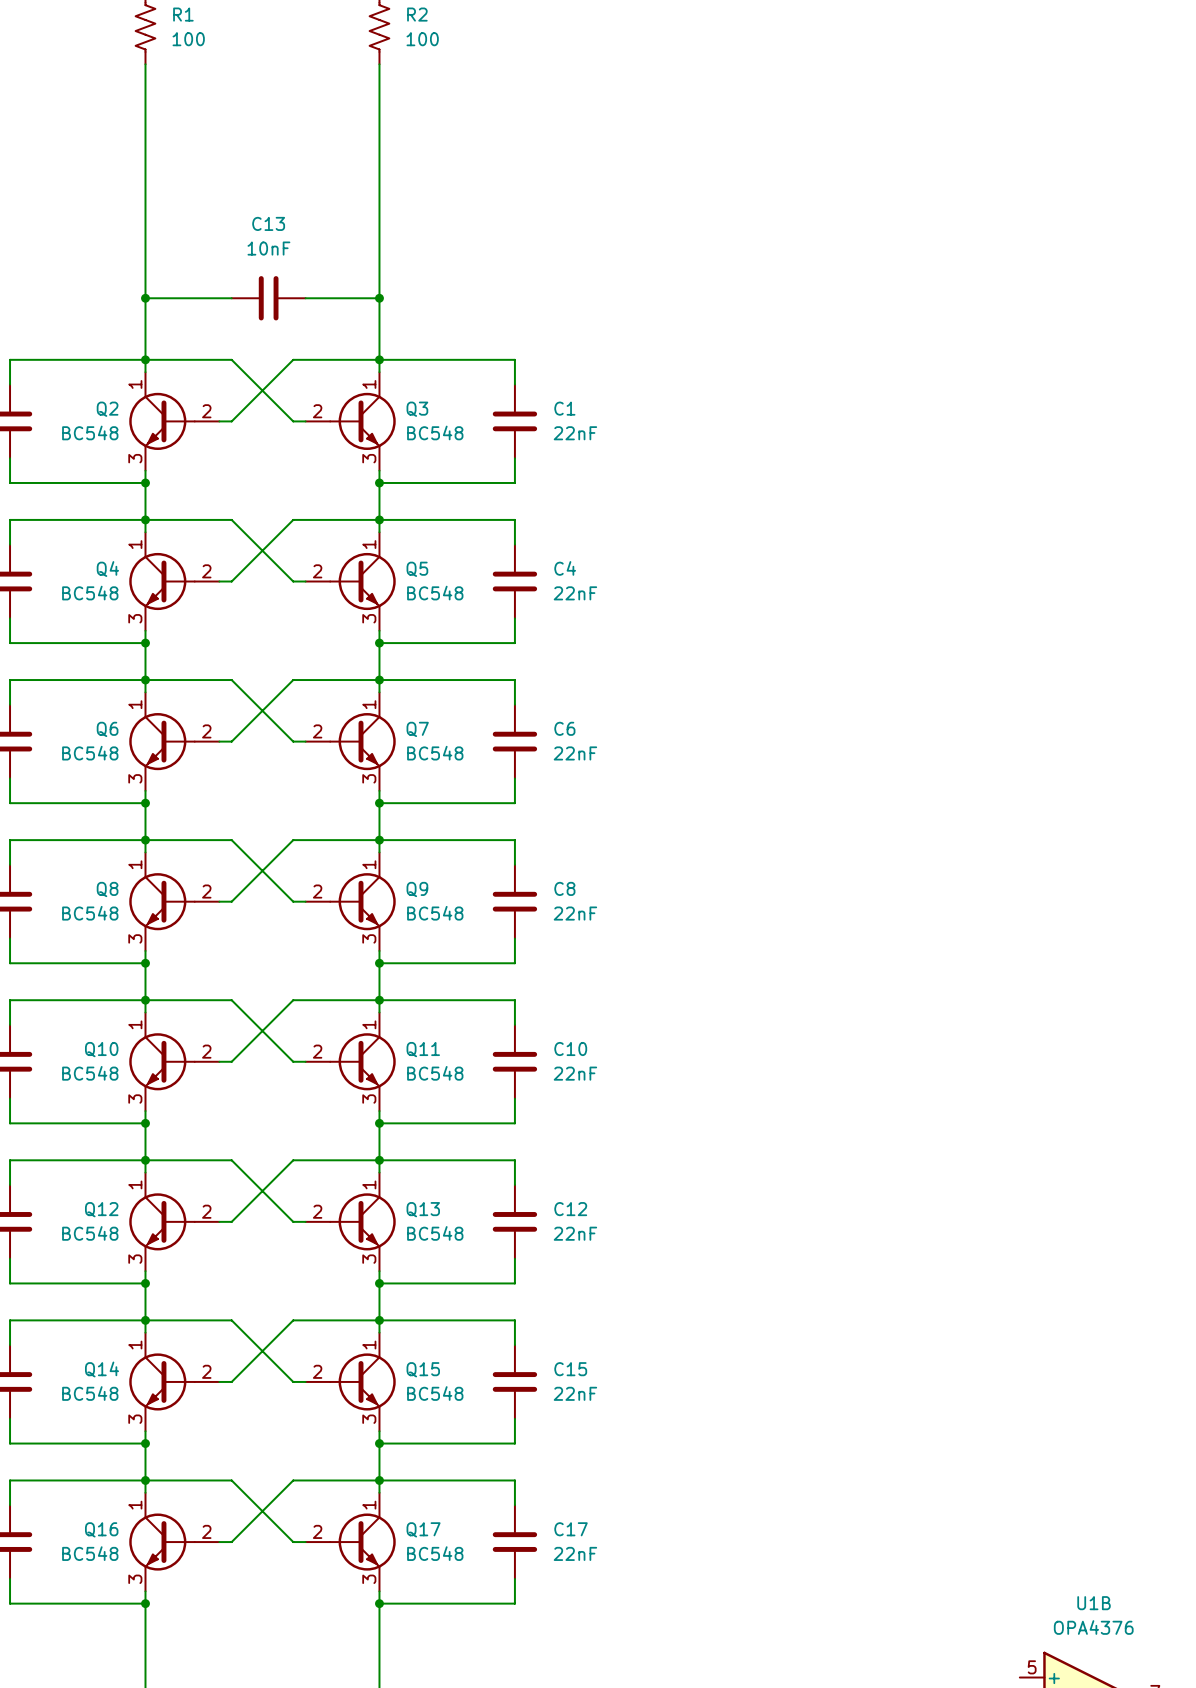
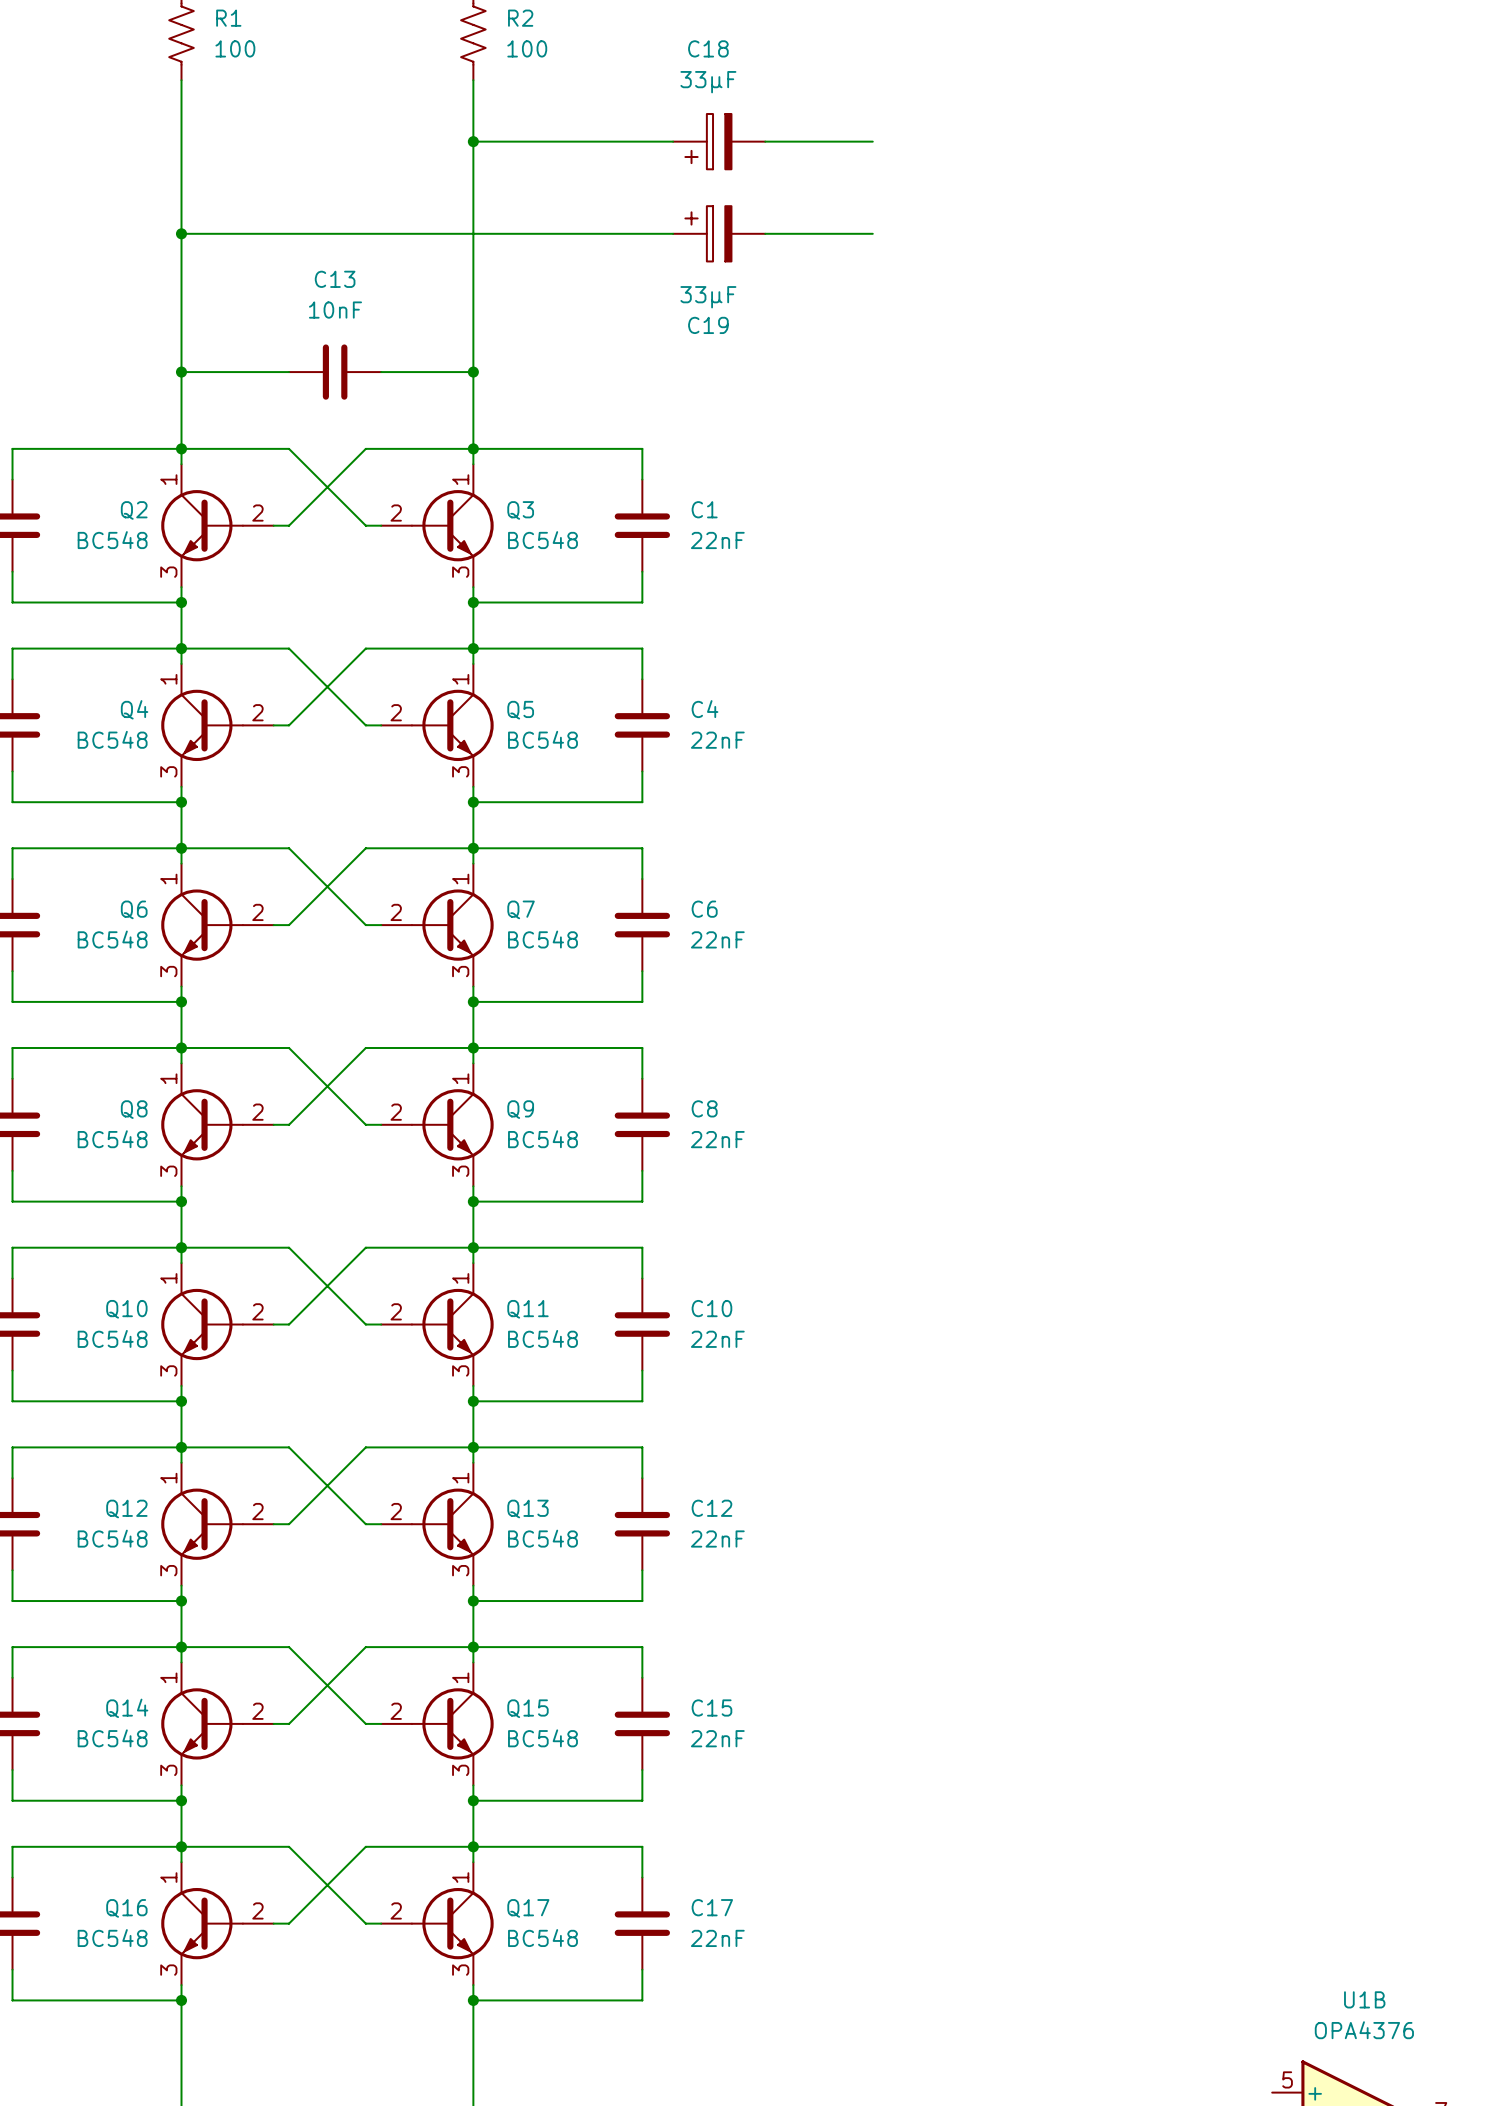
wire: none -> (473, 141) (673, 141)
junction: none -> (473, 141)
C18: none -> 33µF (719, 141)
wire: none -> (765, 141) (872, 141)
wire: none -> (181, 233) (673, 233)
junction: none -> (181, 233)
C19: none -> 33µF (719, 233)
wire: none -> (765, 233) (872, 233)

